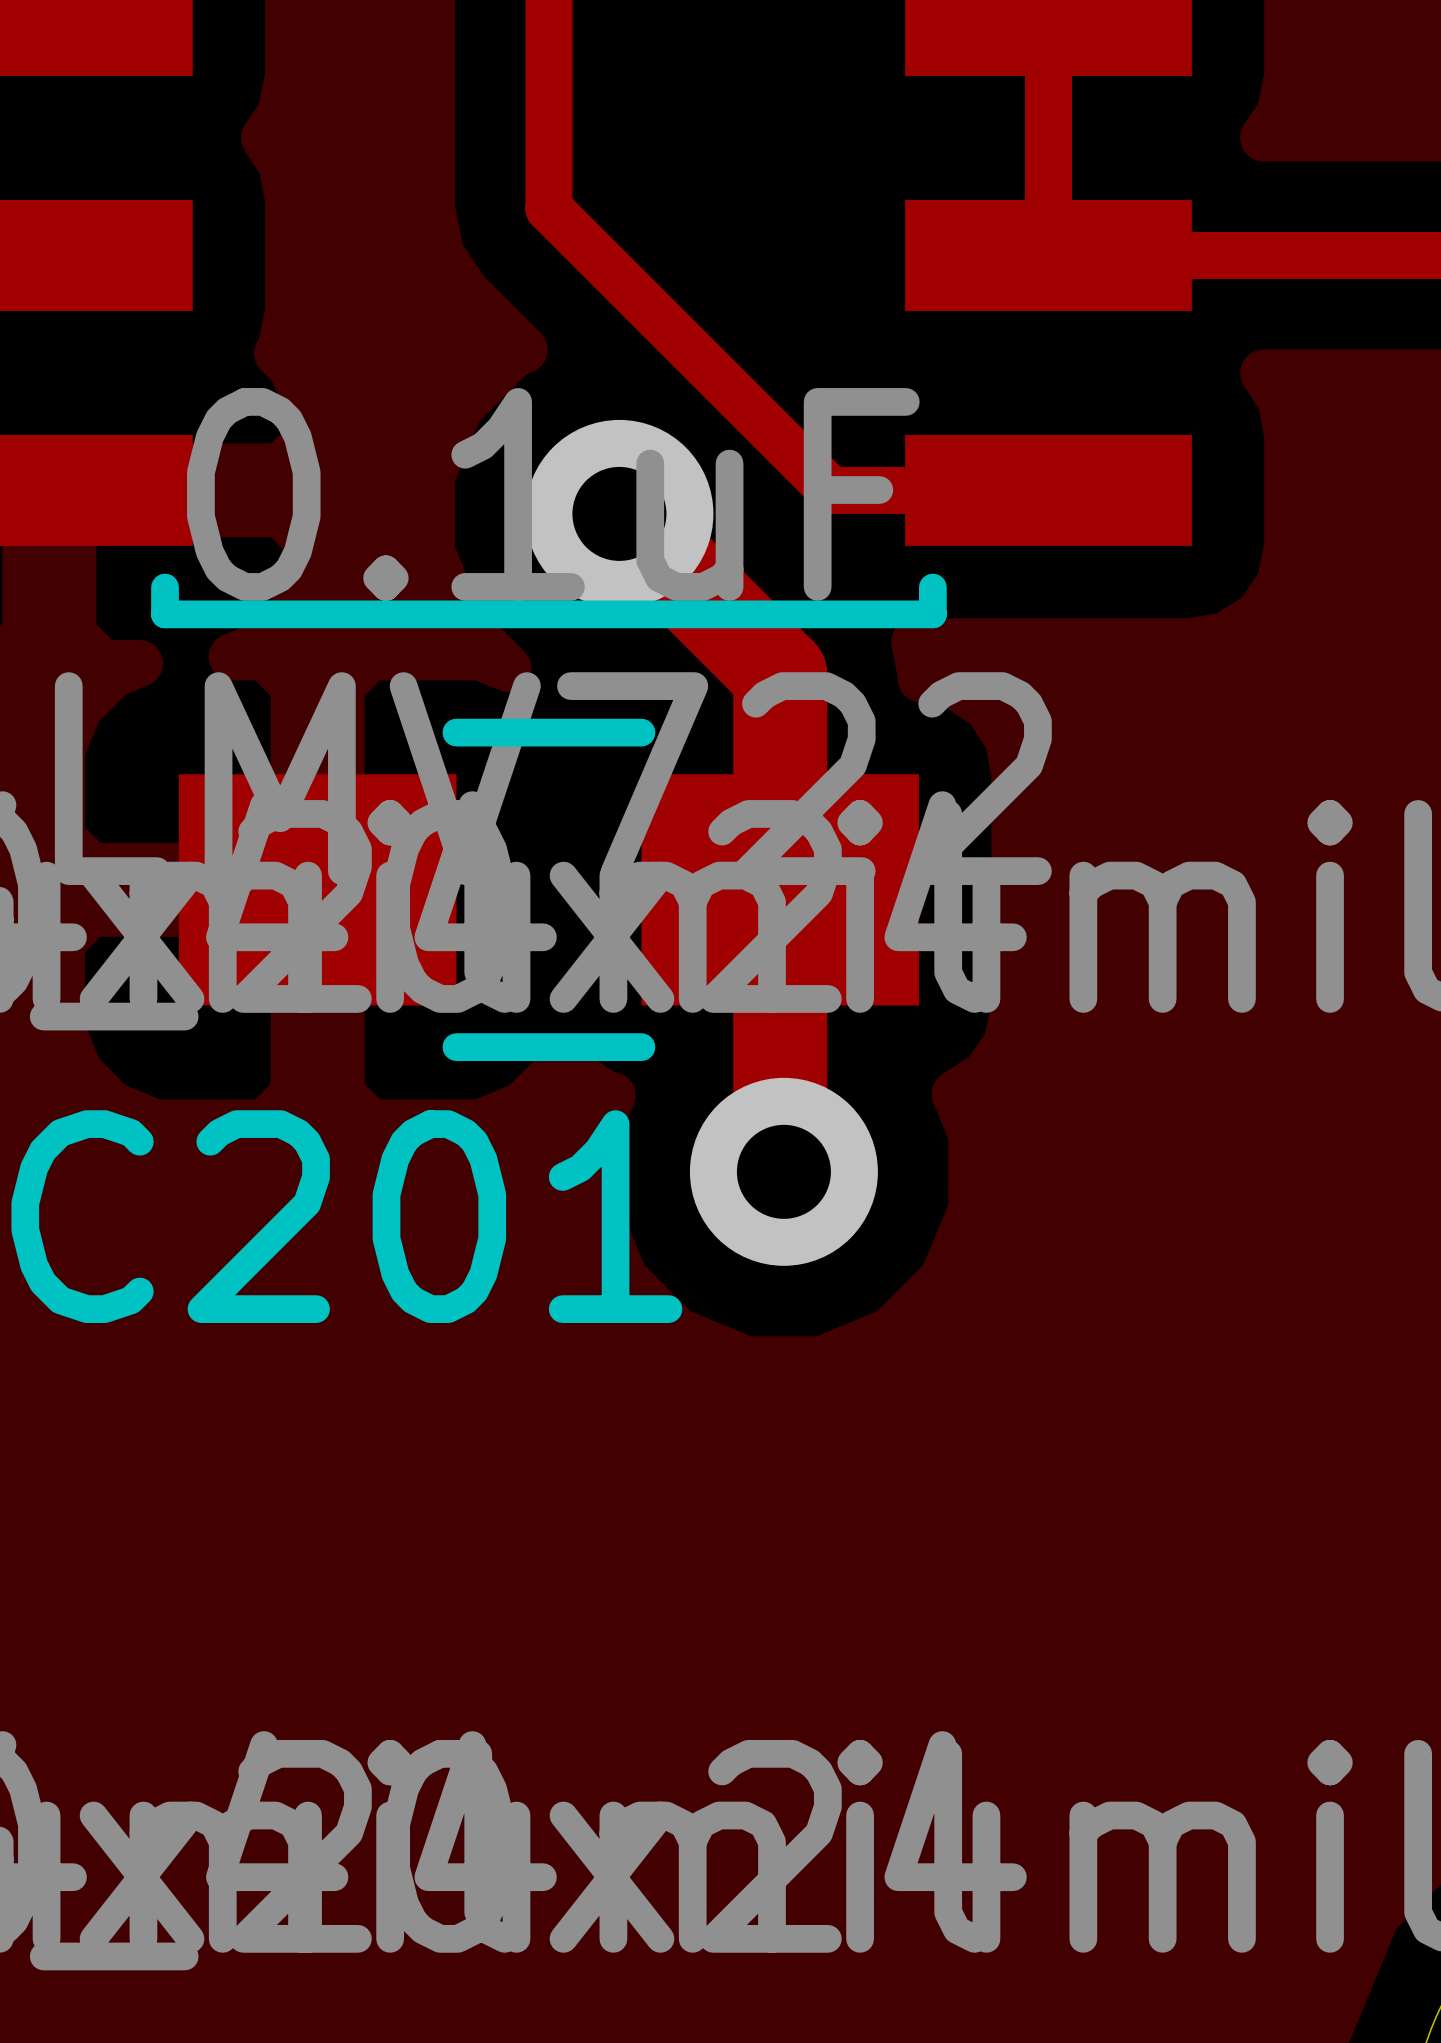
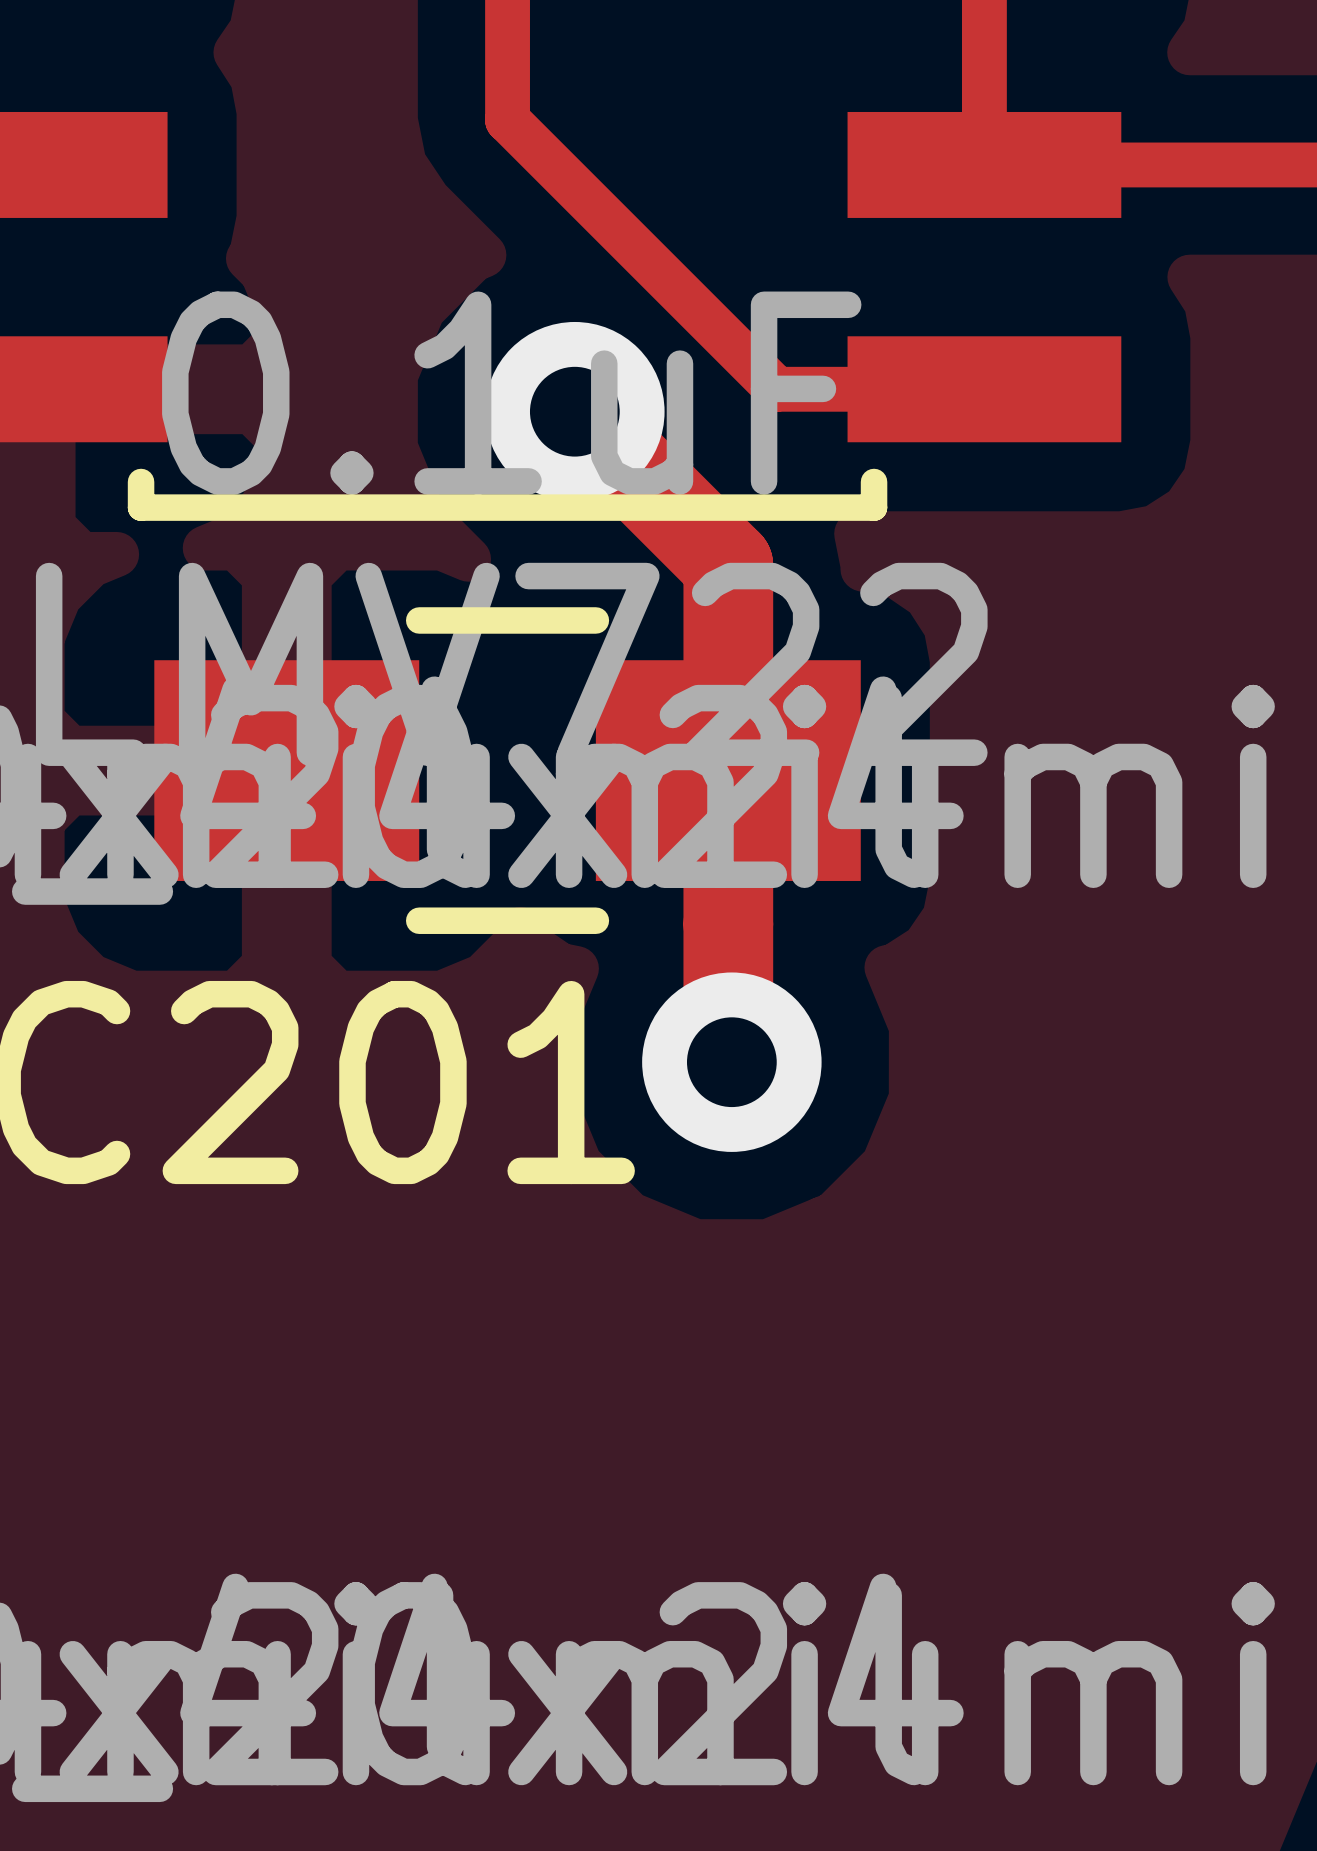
via position: (783, 1171) -> (731, 1062)

